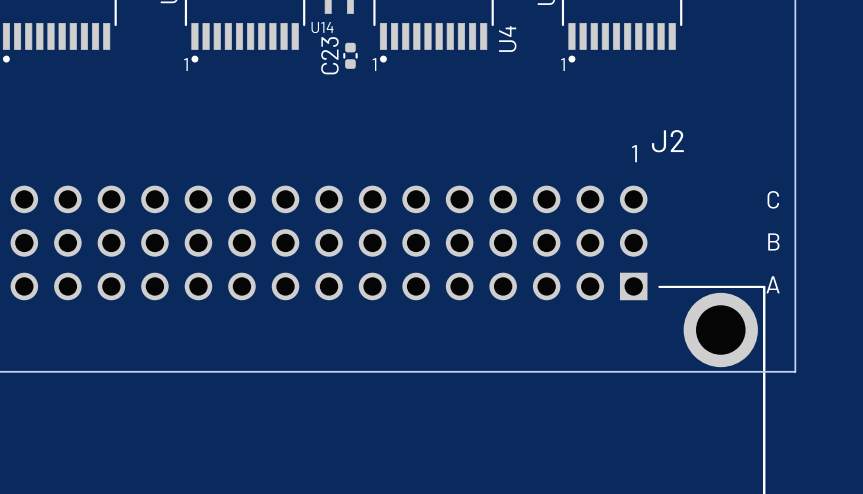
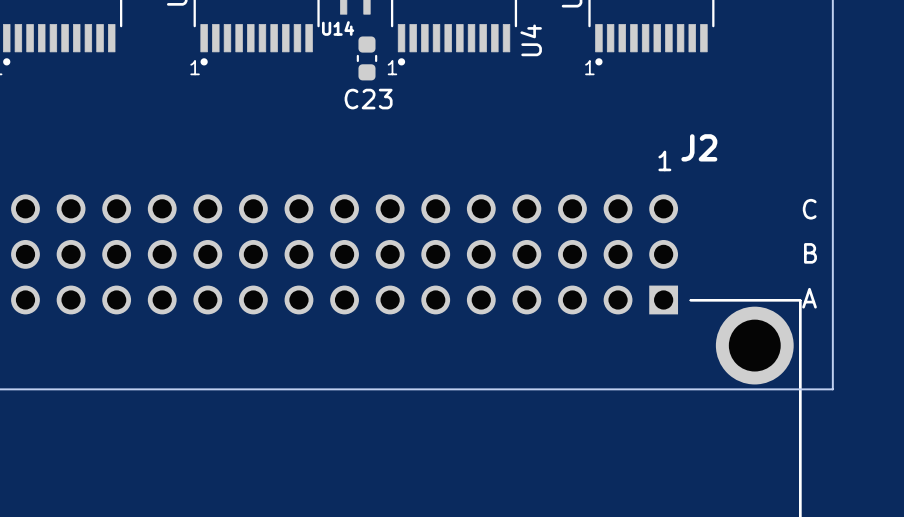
C23 footprint: [343, 42, 358, 69] -> [356, 36, 378, 81]
C23 name rotation: 0° (329, 55) -> 90° clockwise (368, 99)

